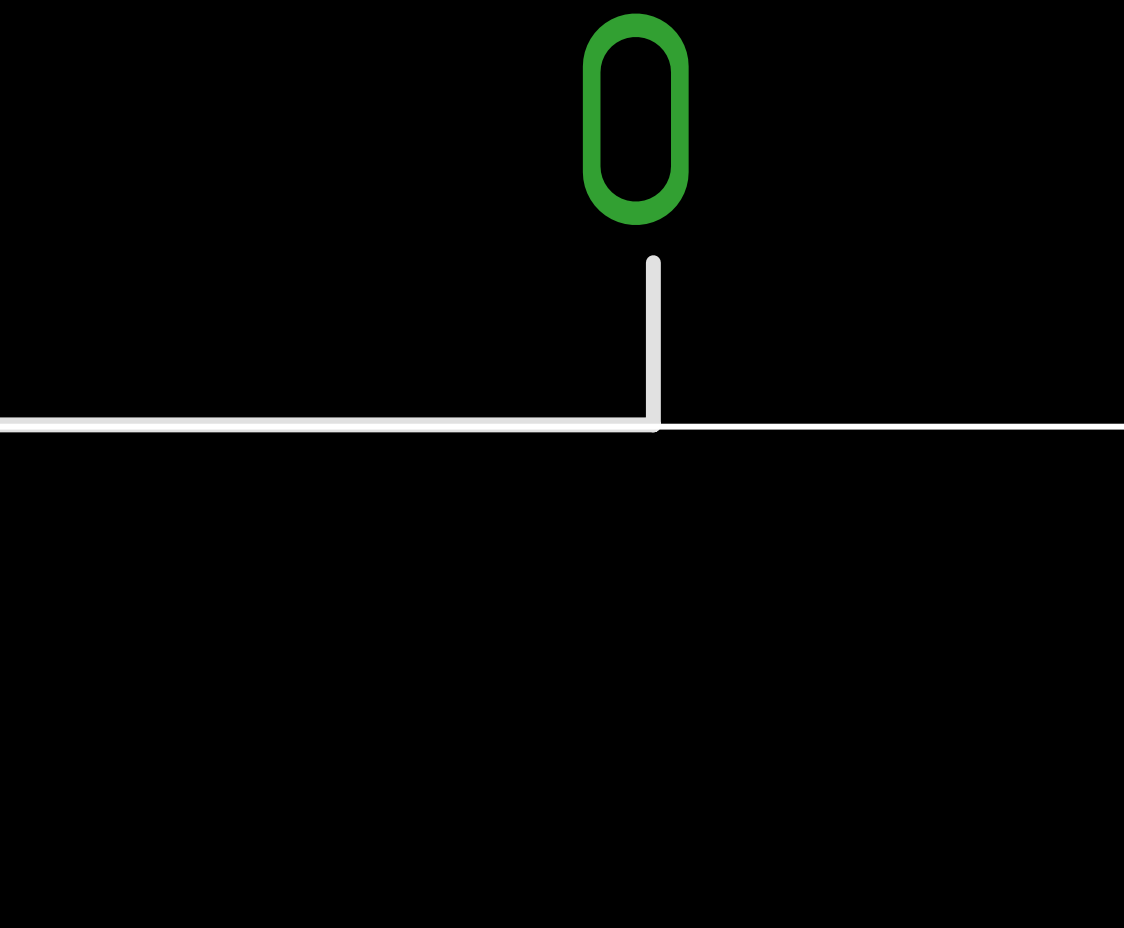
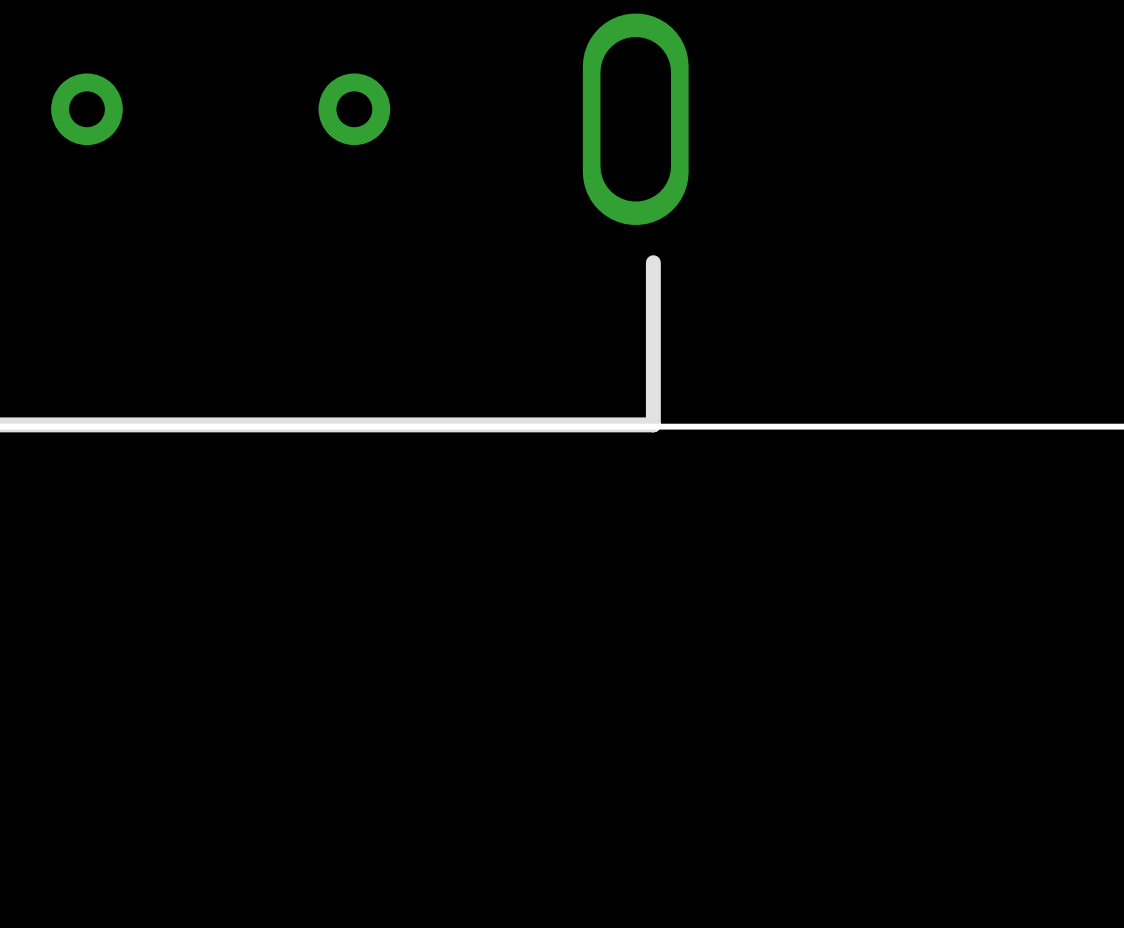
via: none -> (86, 109)
via: none -> (354, 109)

